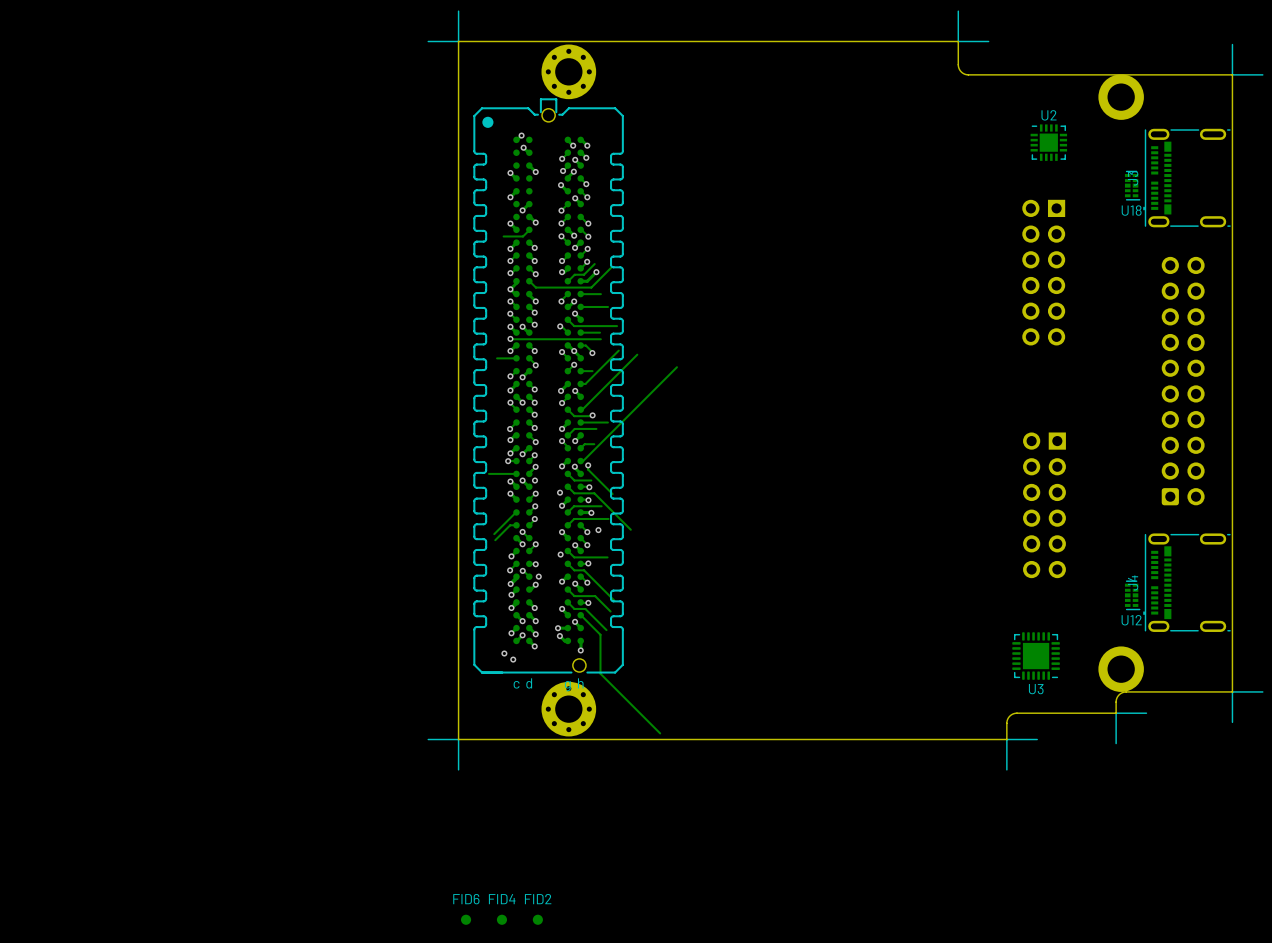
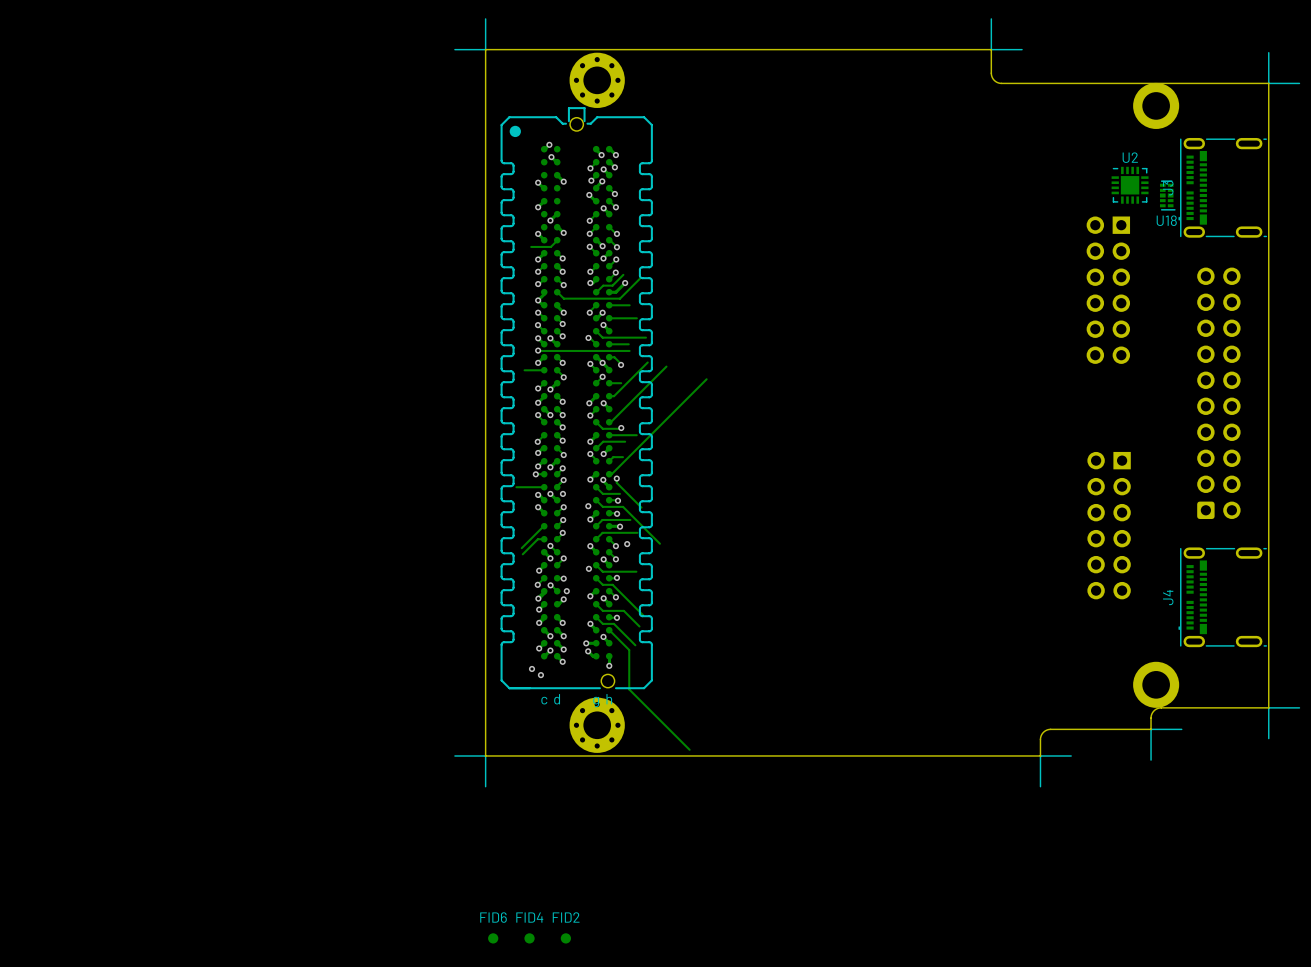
U2 position: (1048, 142) -> (1130, 185)
part position: (1043, 272) -> (1108, 290)
part position: (1044, 505) -> (1109, 525)
U12: (1132, 595) -> none
U3: (1036, 656) -> none

